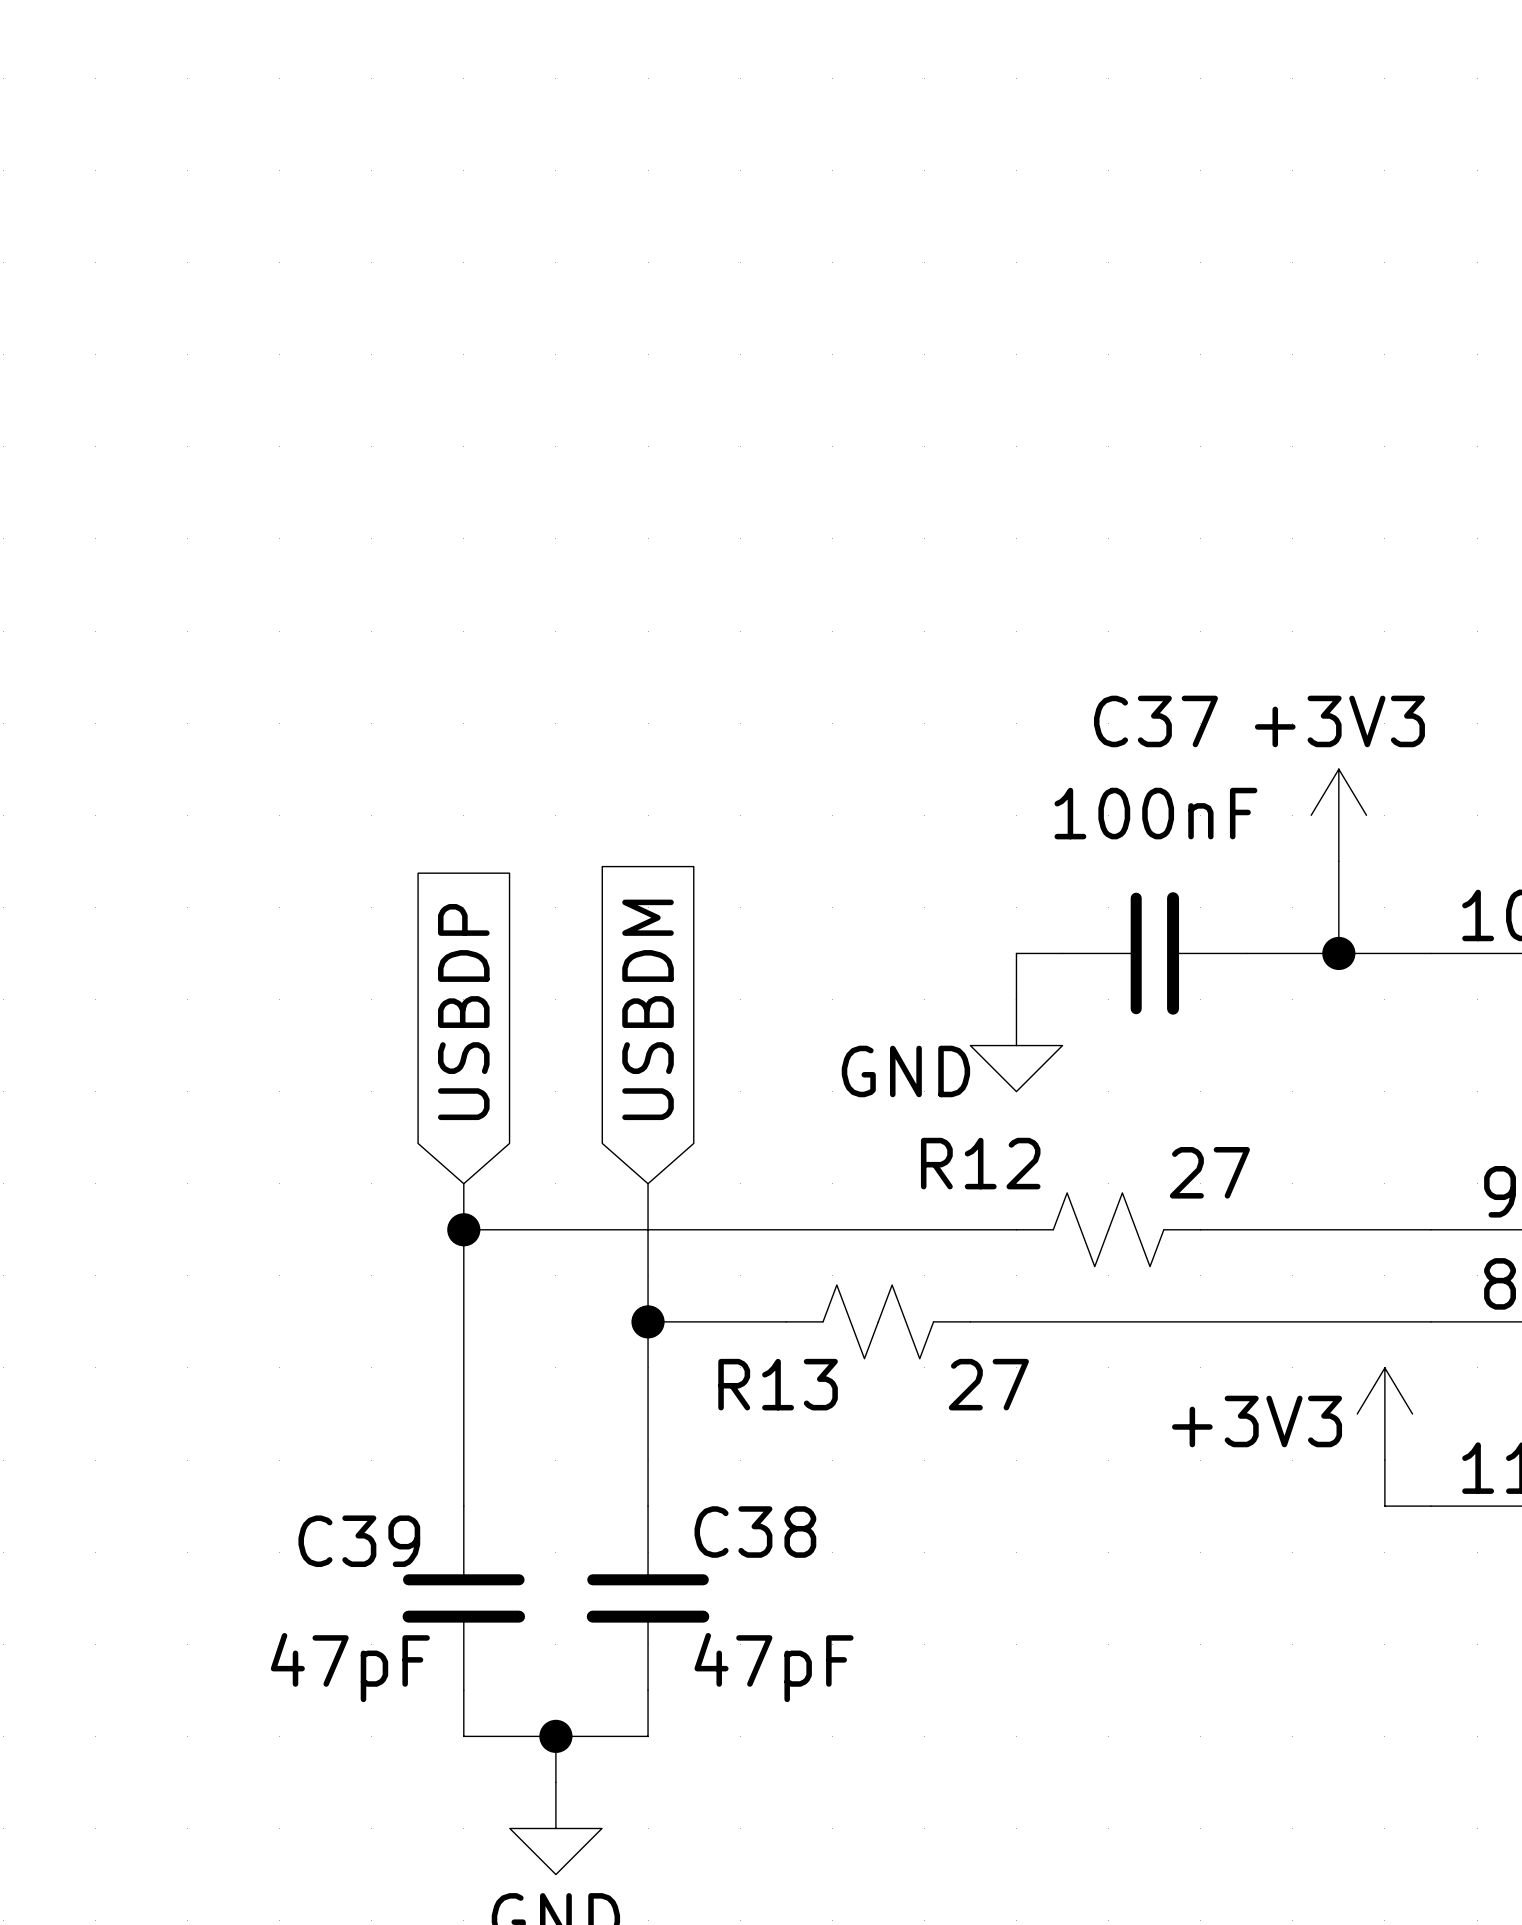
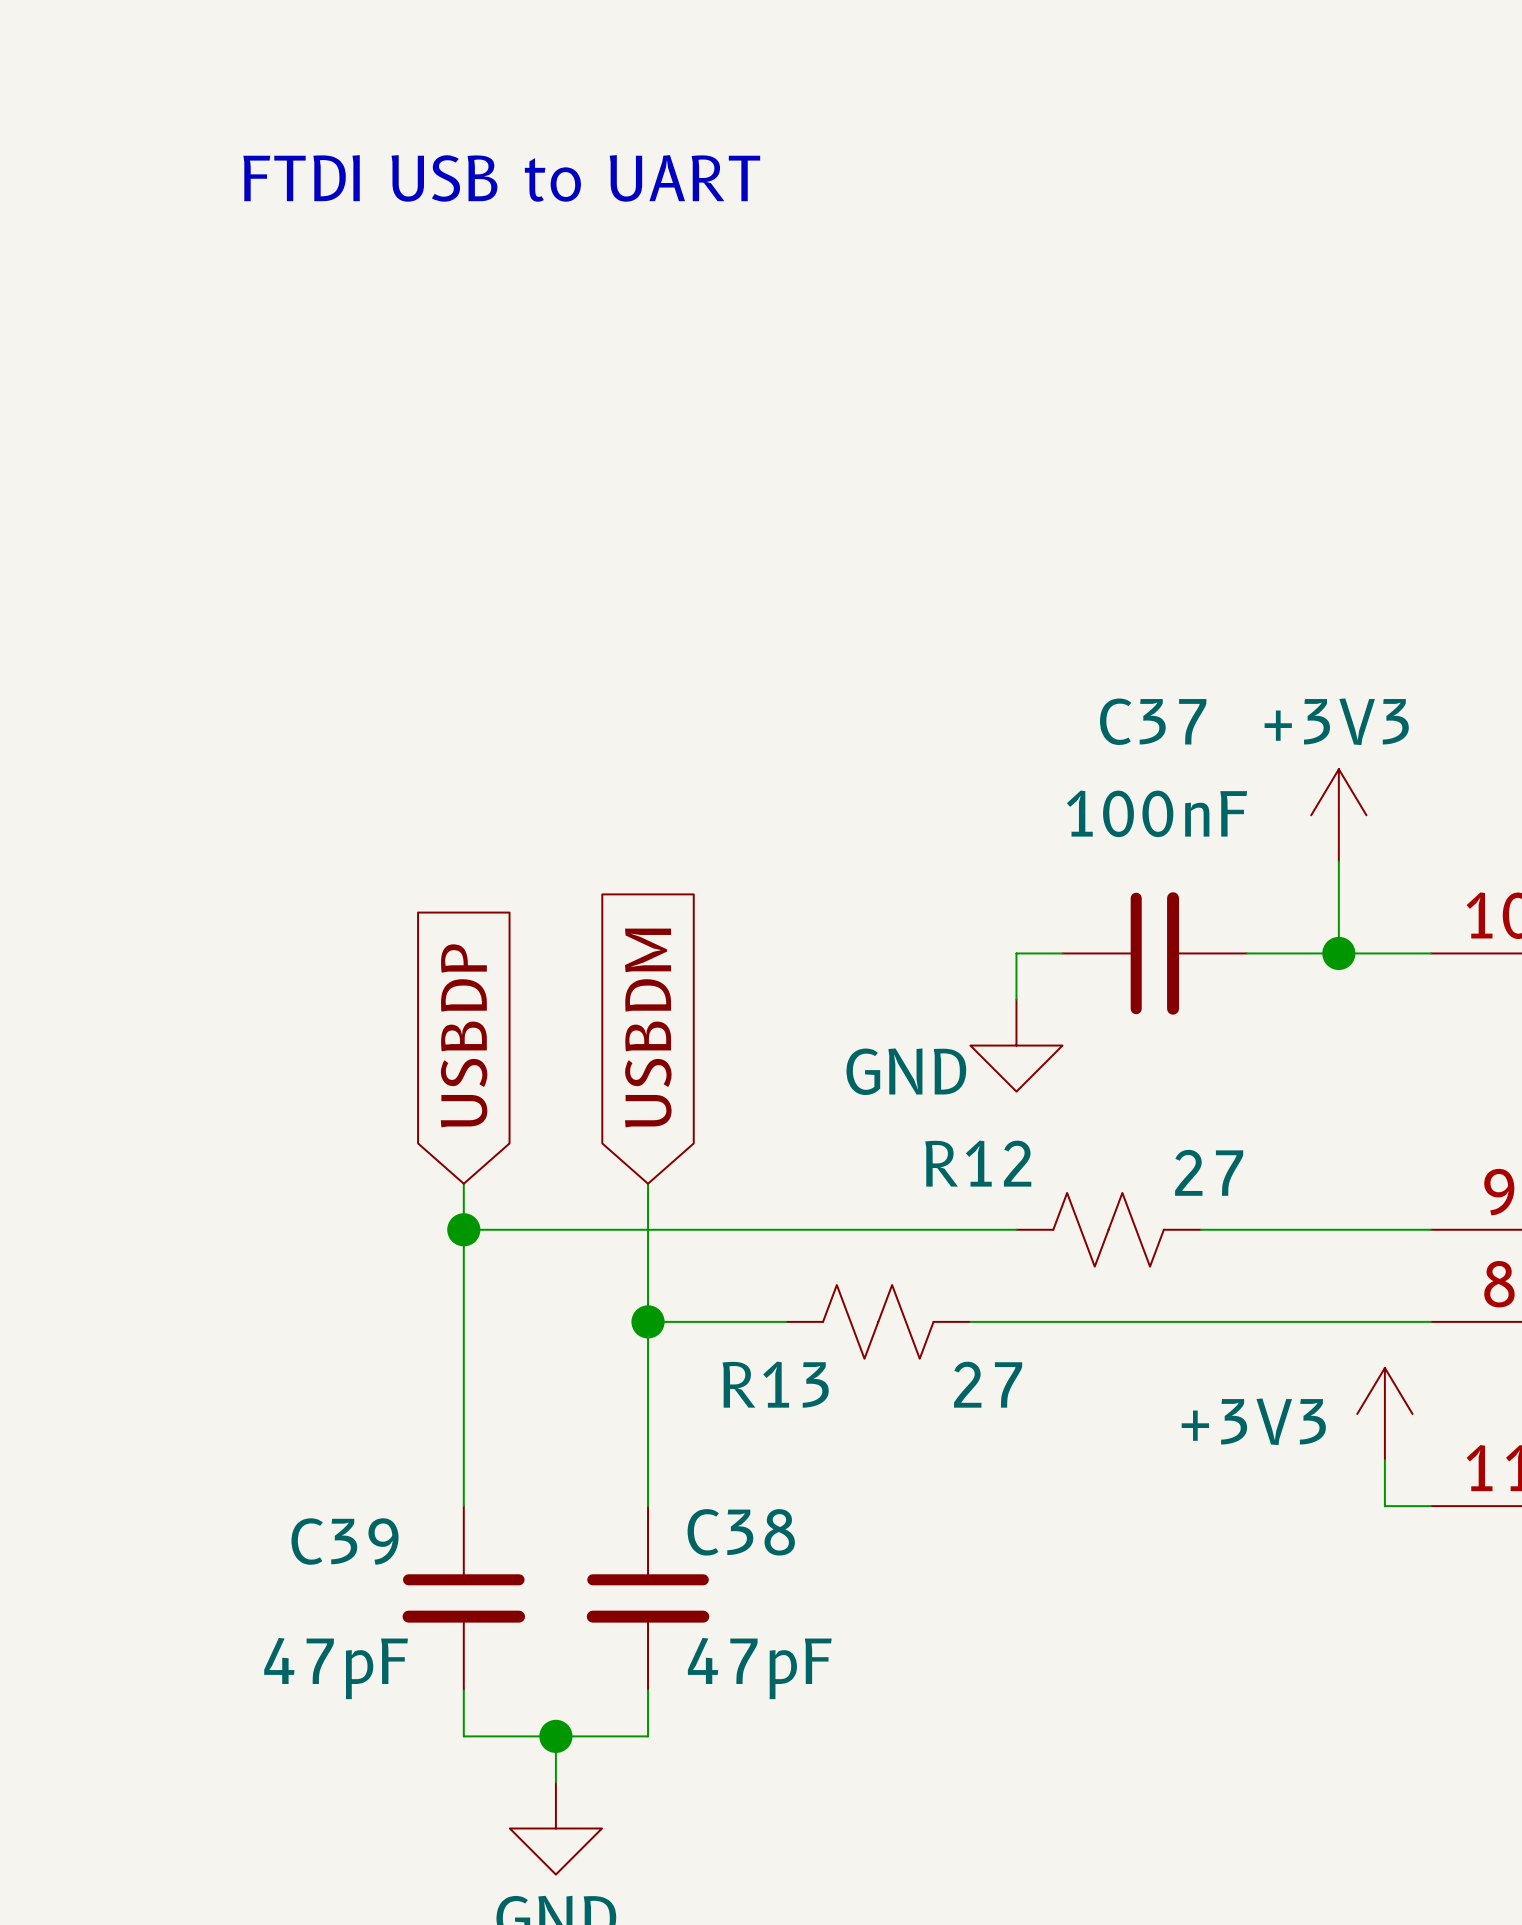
text: none -> FTDI USB to UART (501, 178)

